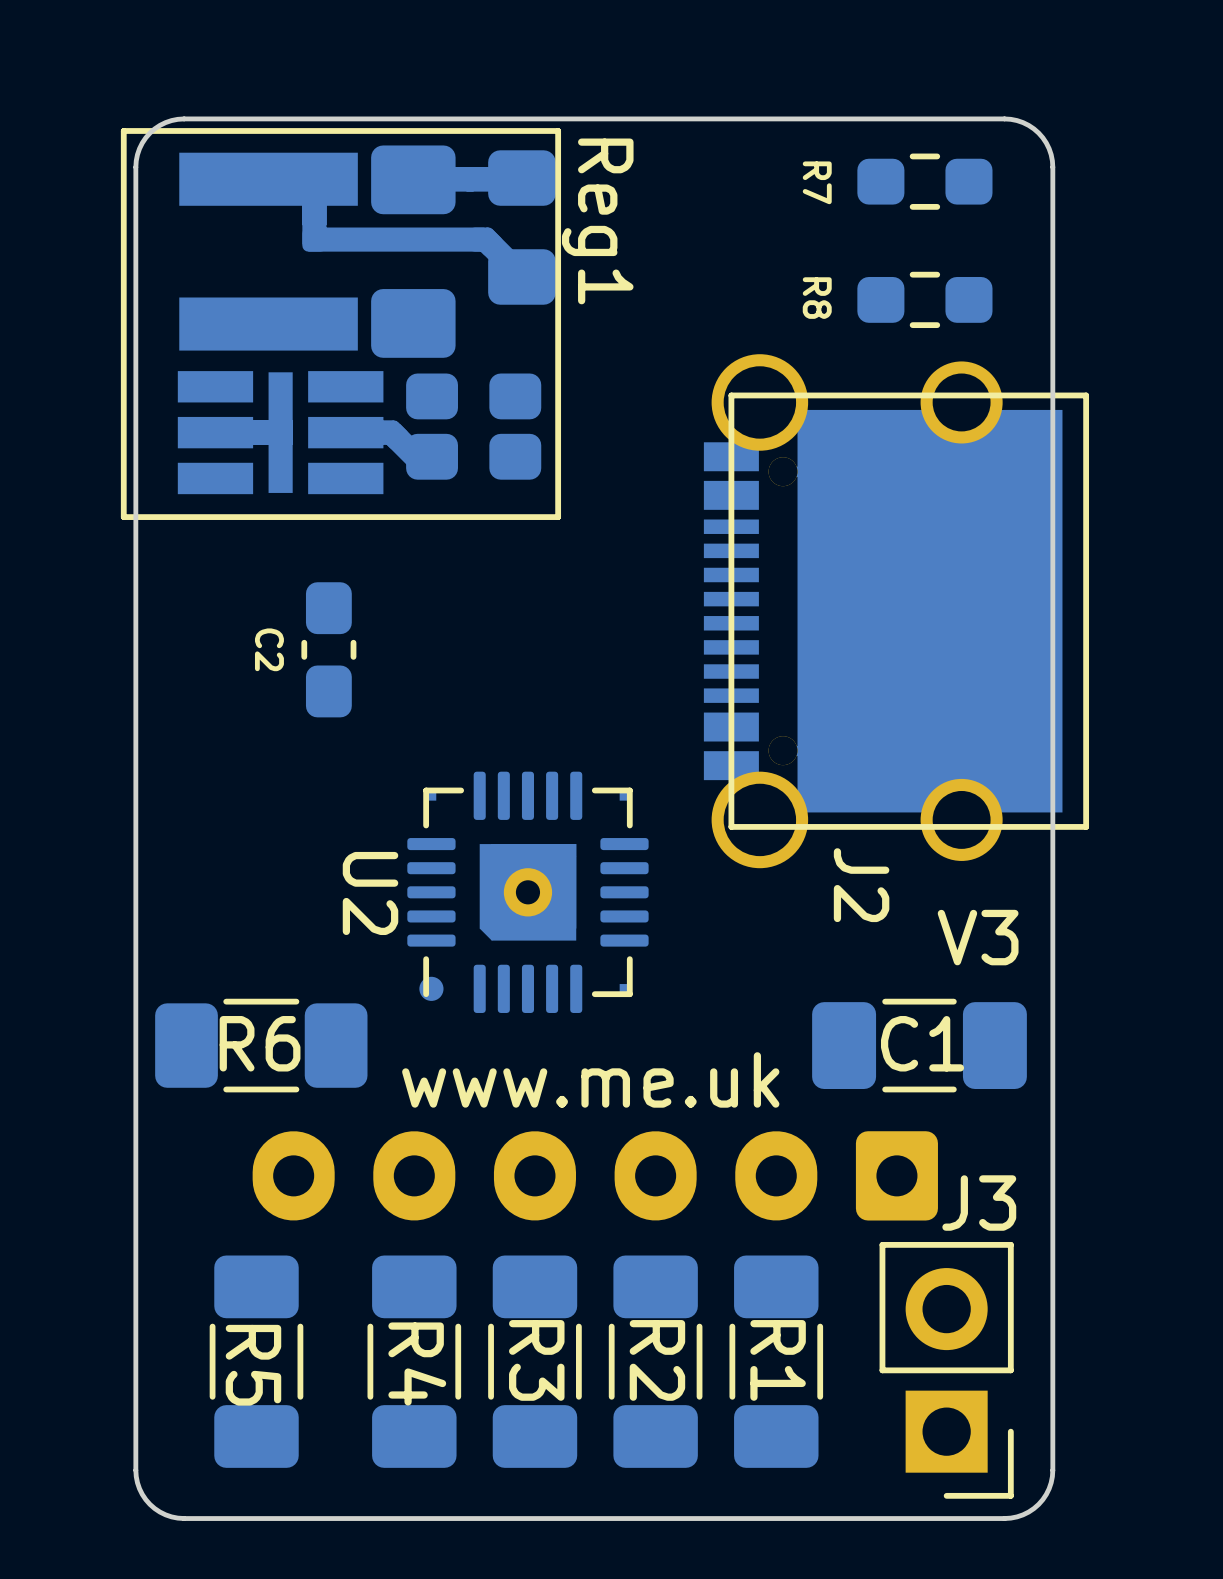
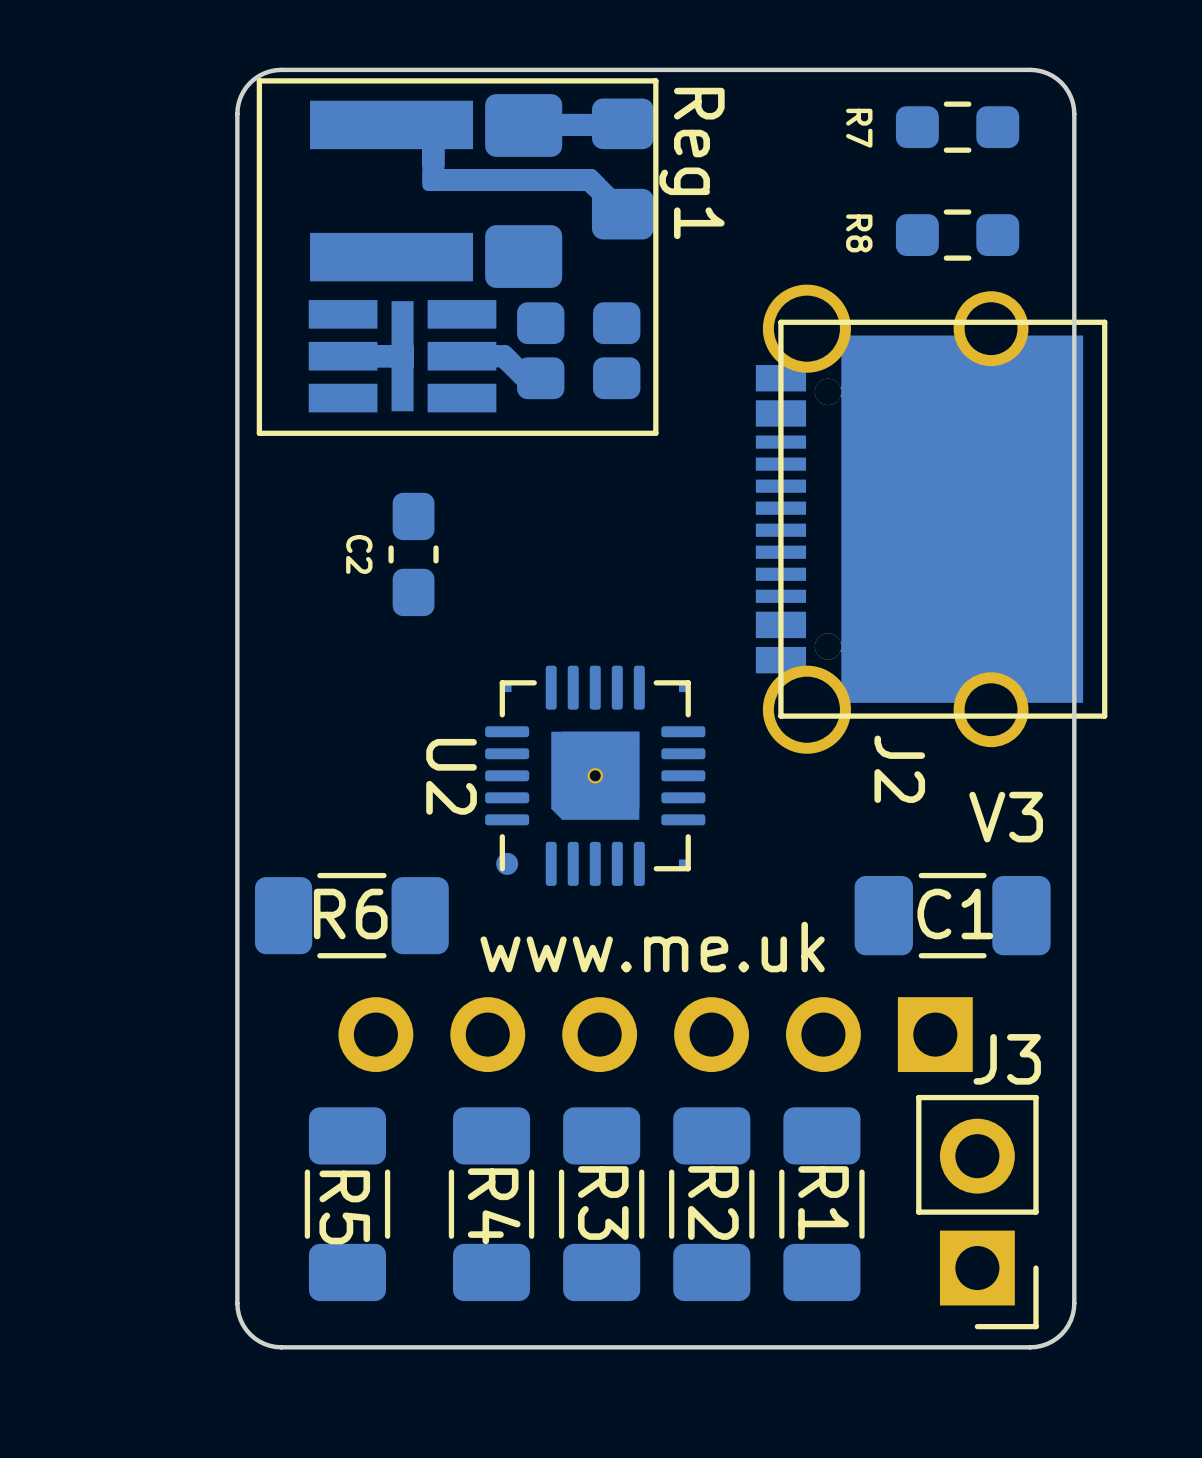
Reg1 position: (340, 324) -> (457, 257)
U2 footprint: [407, 771, 649, 1013] -> [485, 665, 706, 886]
part footprint: [252, 1131, 938, 1221] -> [338, 997, 973, 1073]

